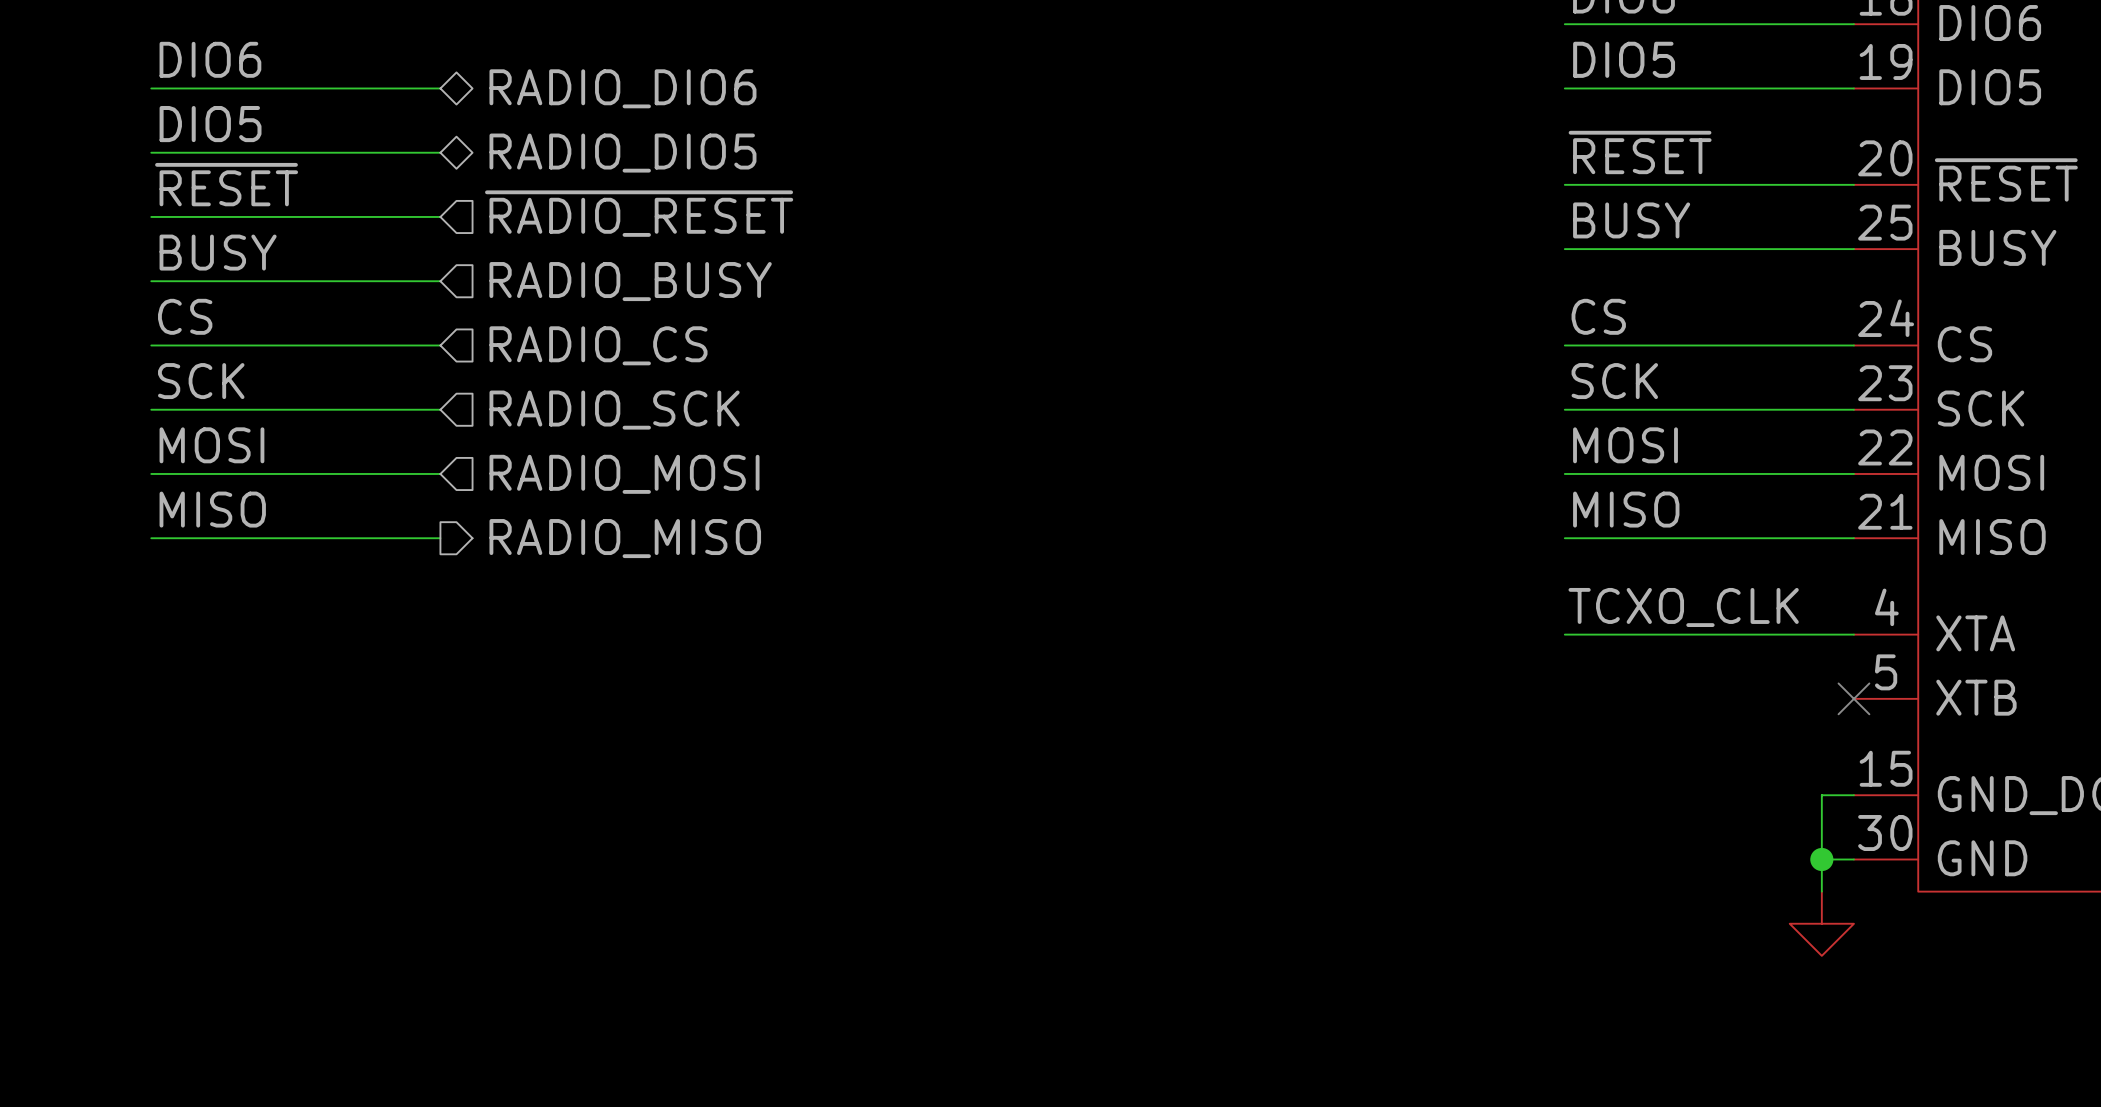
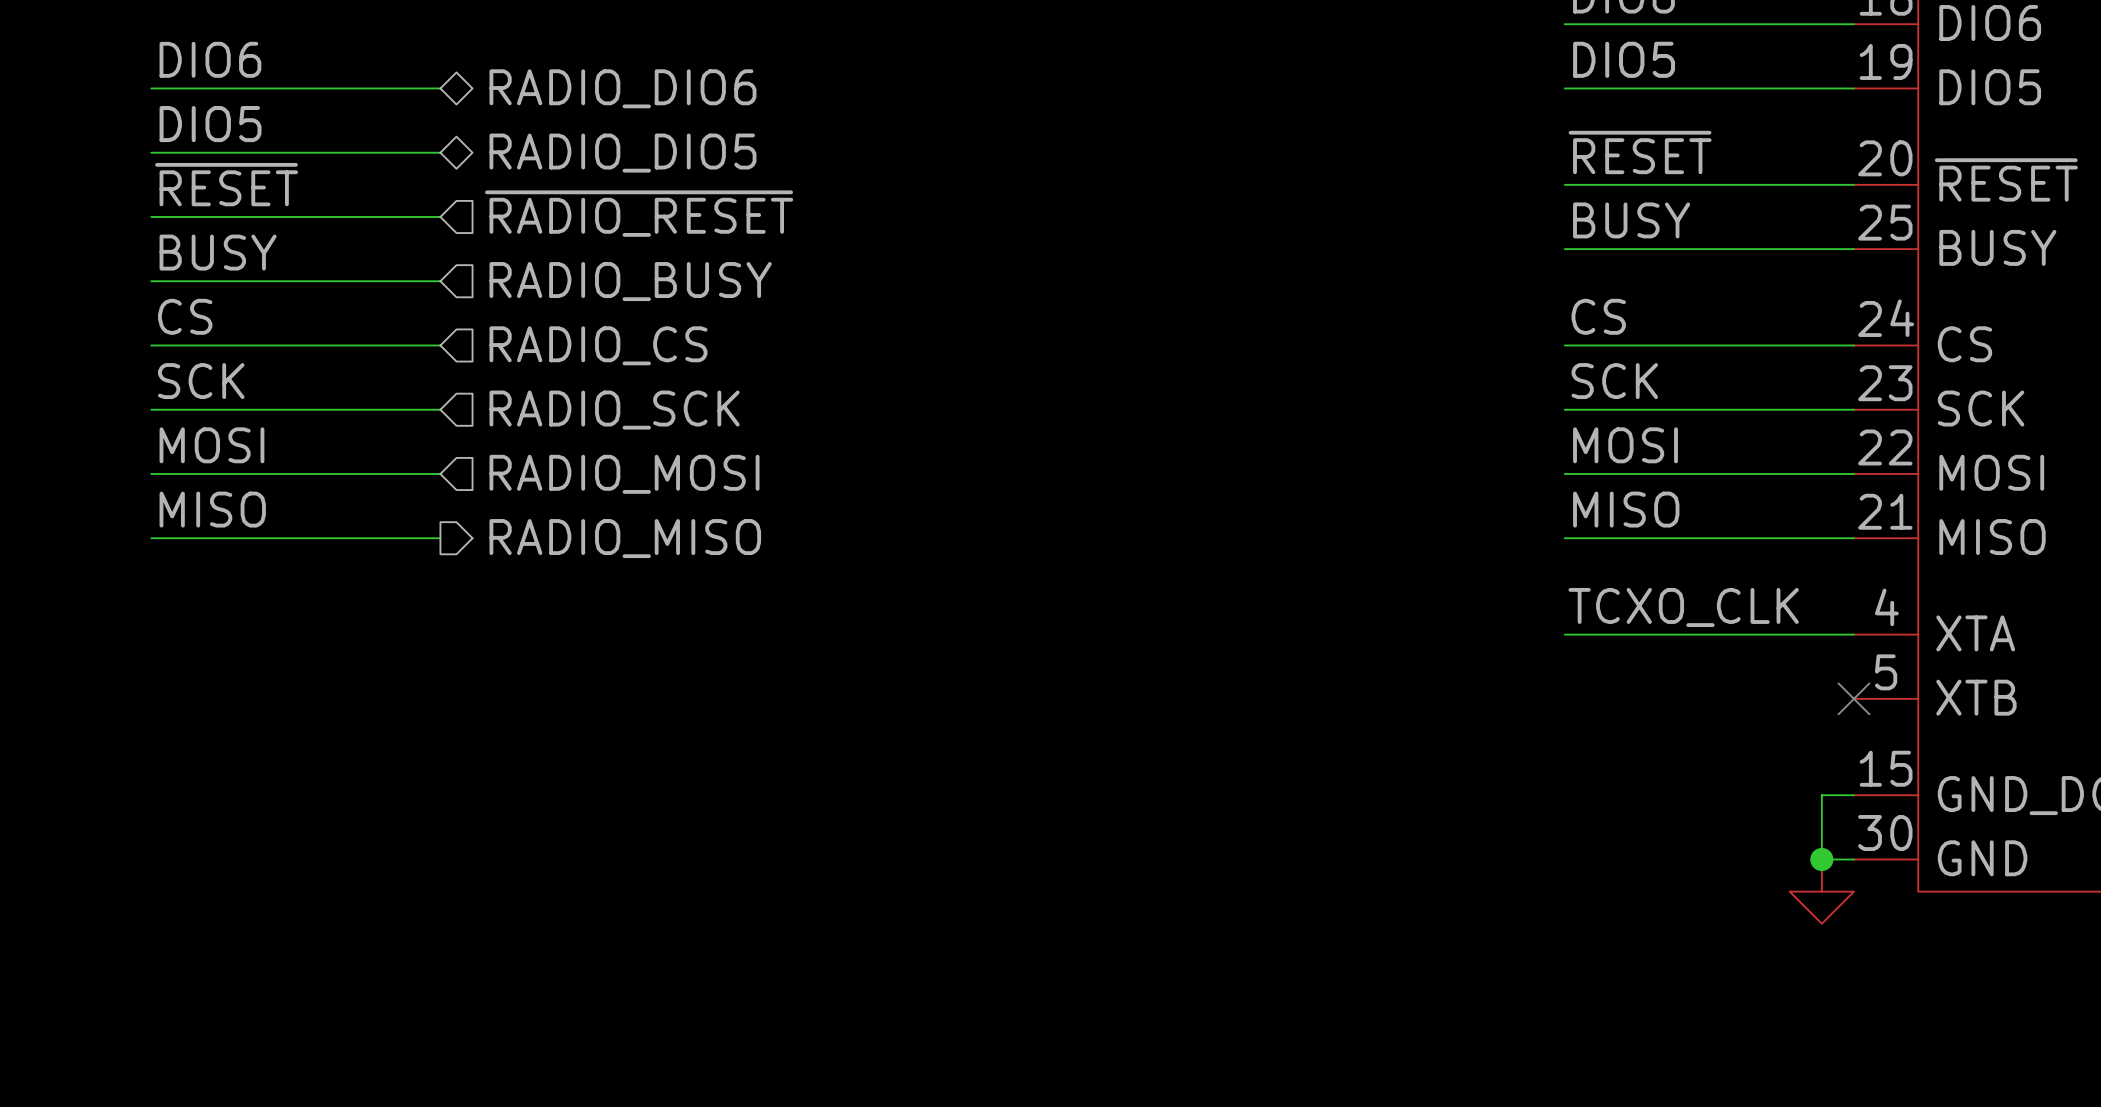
power symbol position: (1821, 923) -> (1821, 891)

